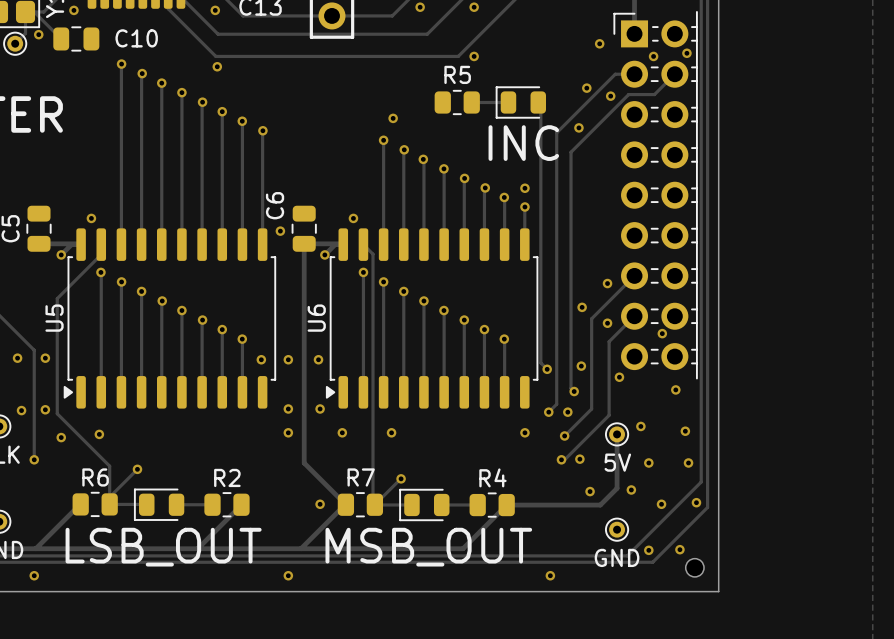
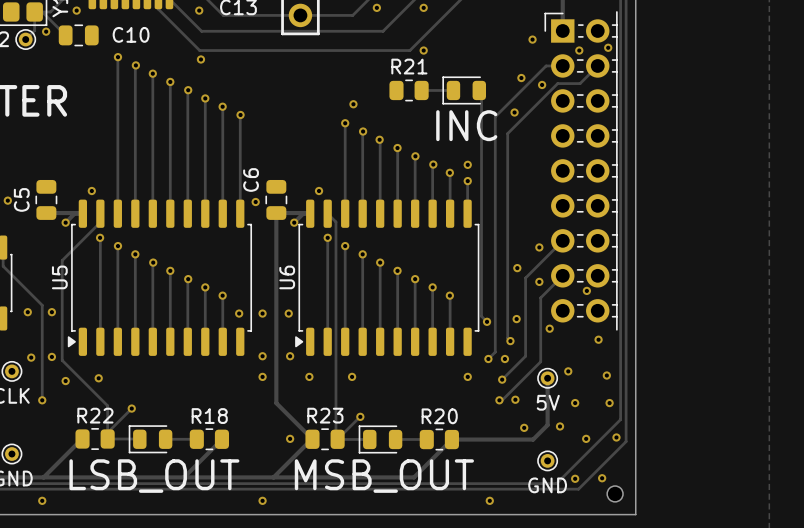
R5 name: R5 (457, 74) -> R21 (409, 66)
R6 name: R6 (95, 477) -> R22 (95, 415)
R2 name: R2 (227, 477) -> R18 (209, 416)
R7 name: R7 (361, 477) -> R23 (325, 415)
R4 name: R4 (492, 477) -> R20 (439, 416)

